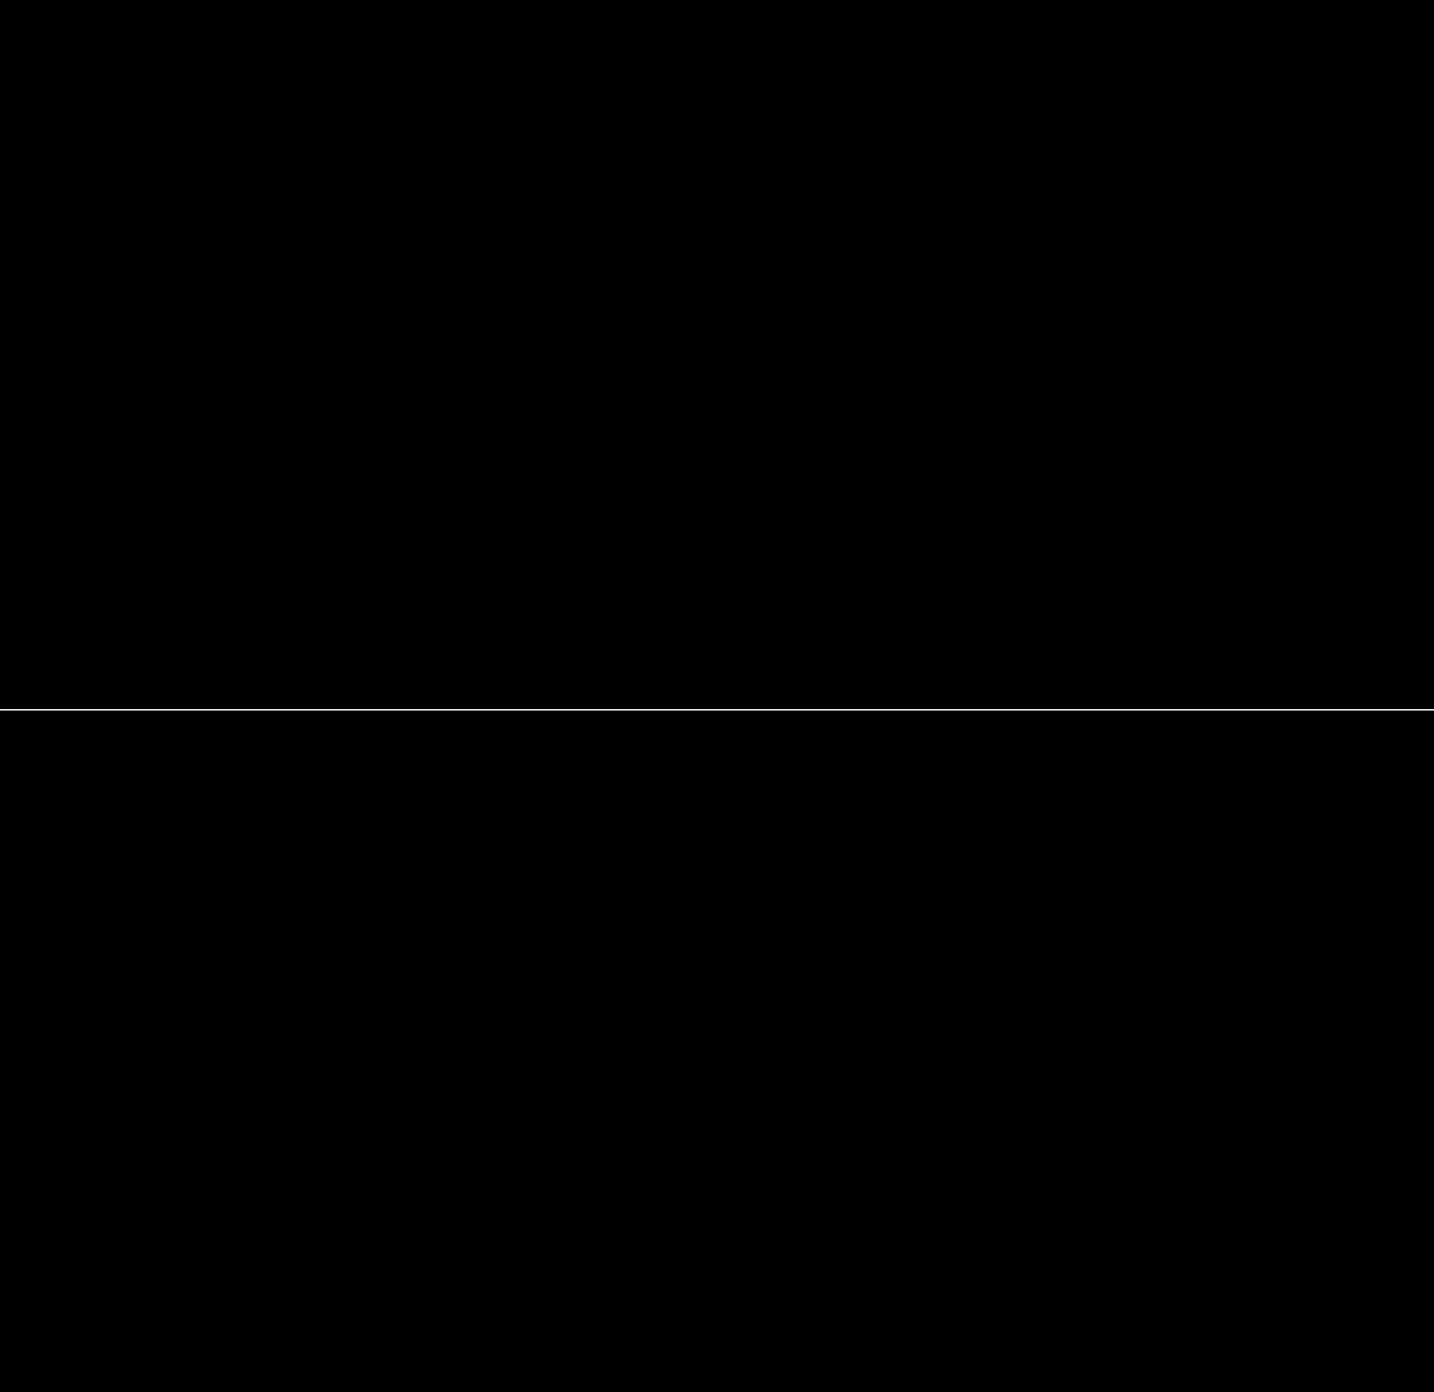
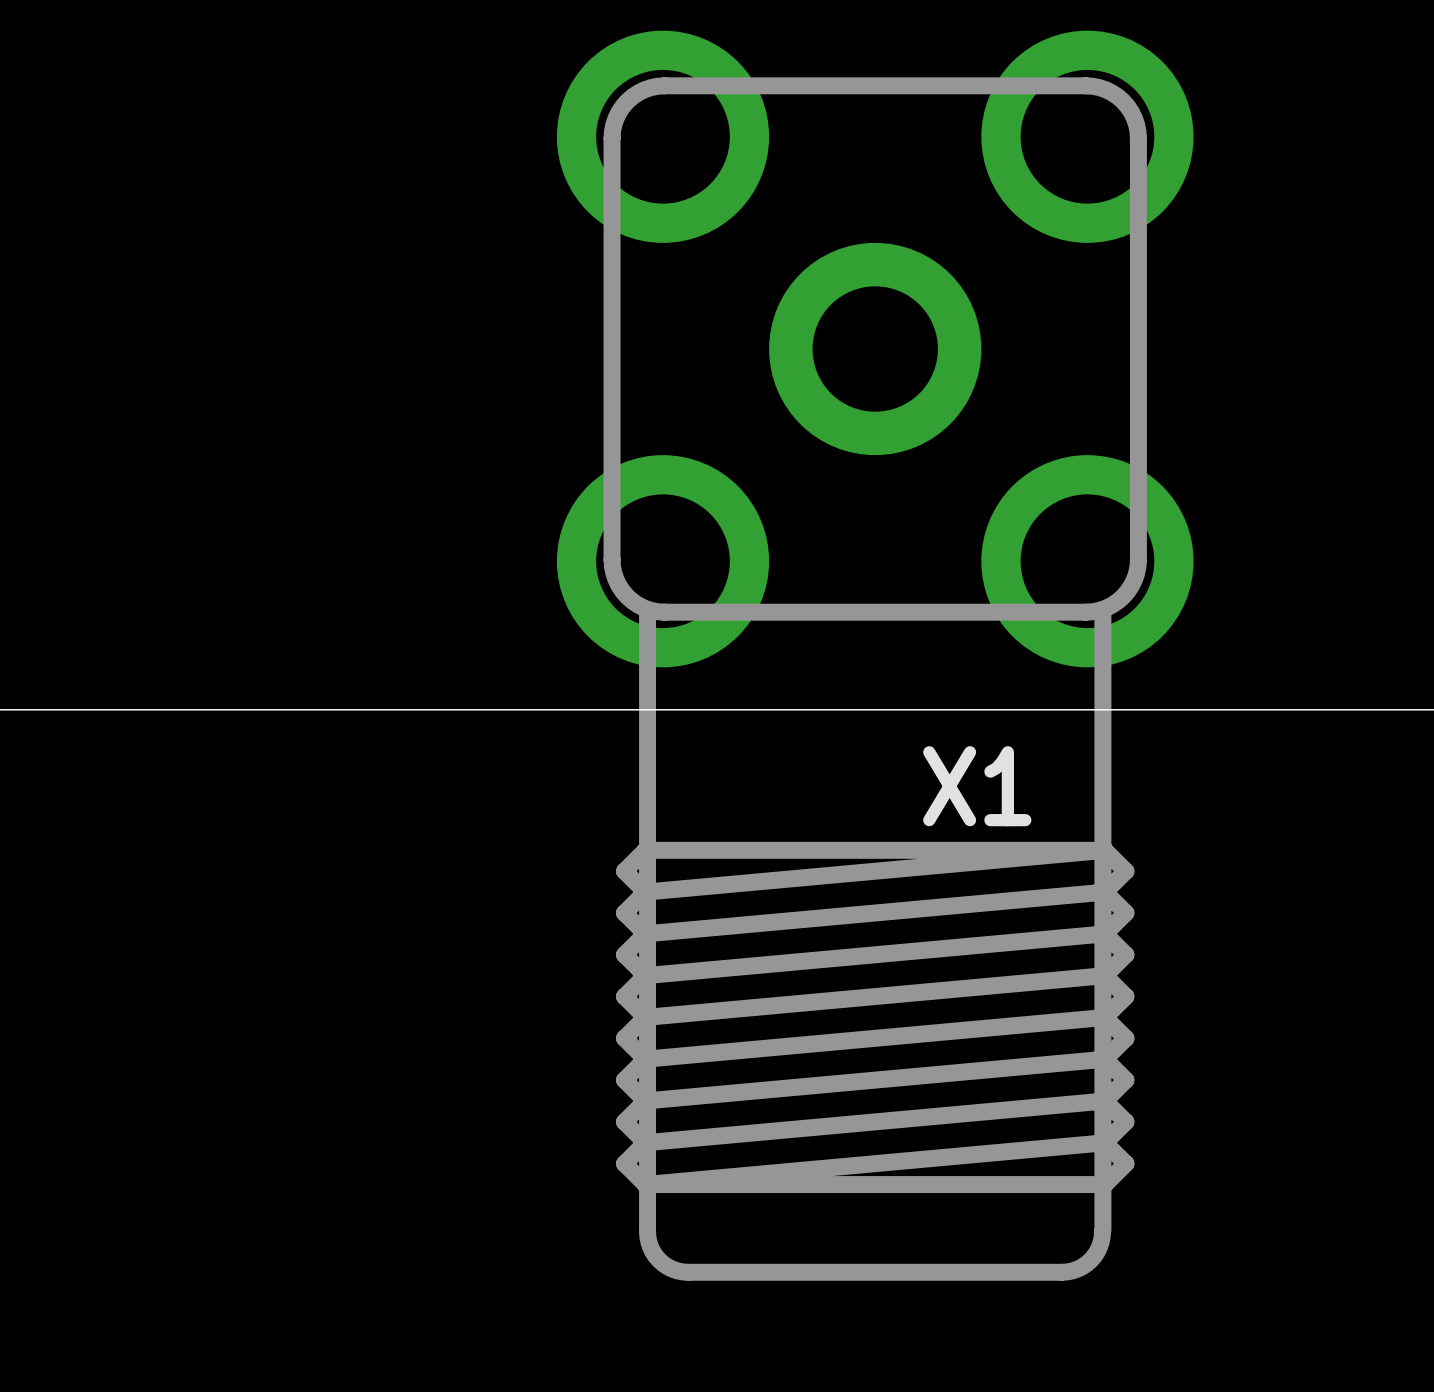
X1: none -> (875, 655)

